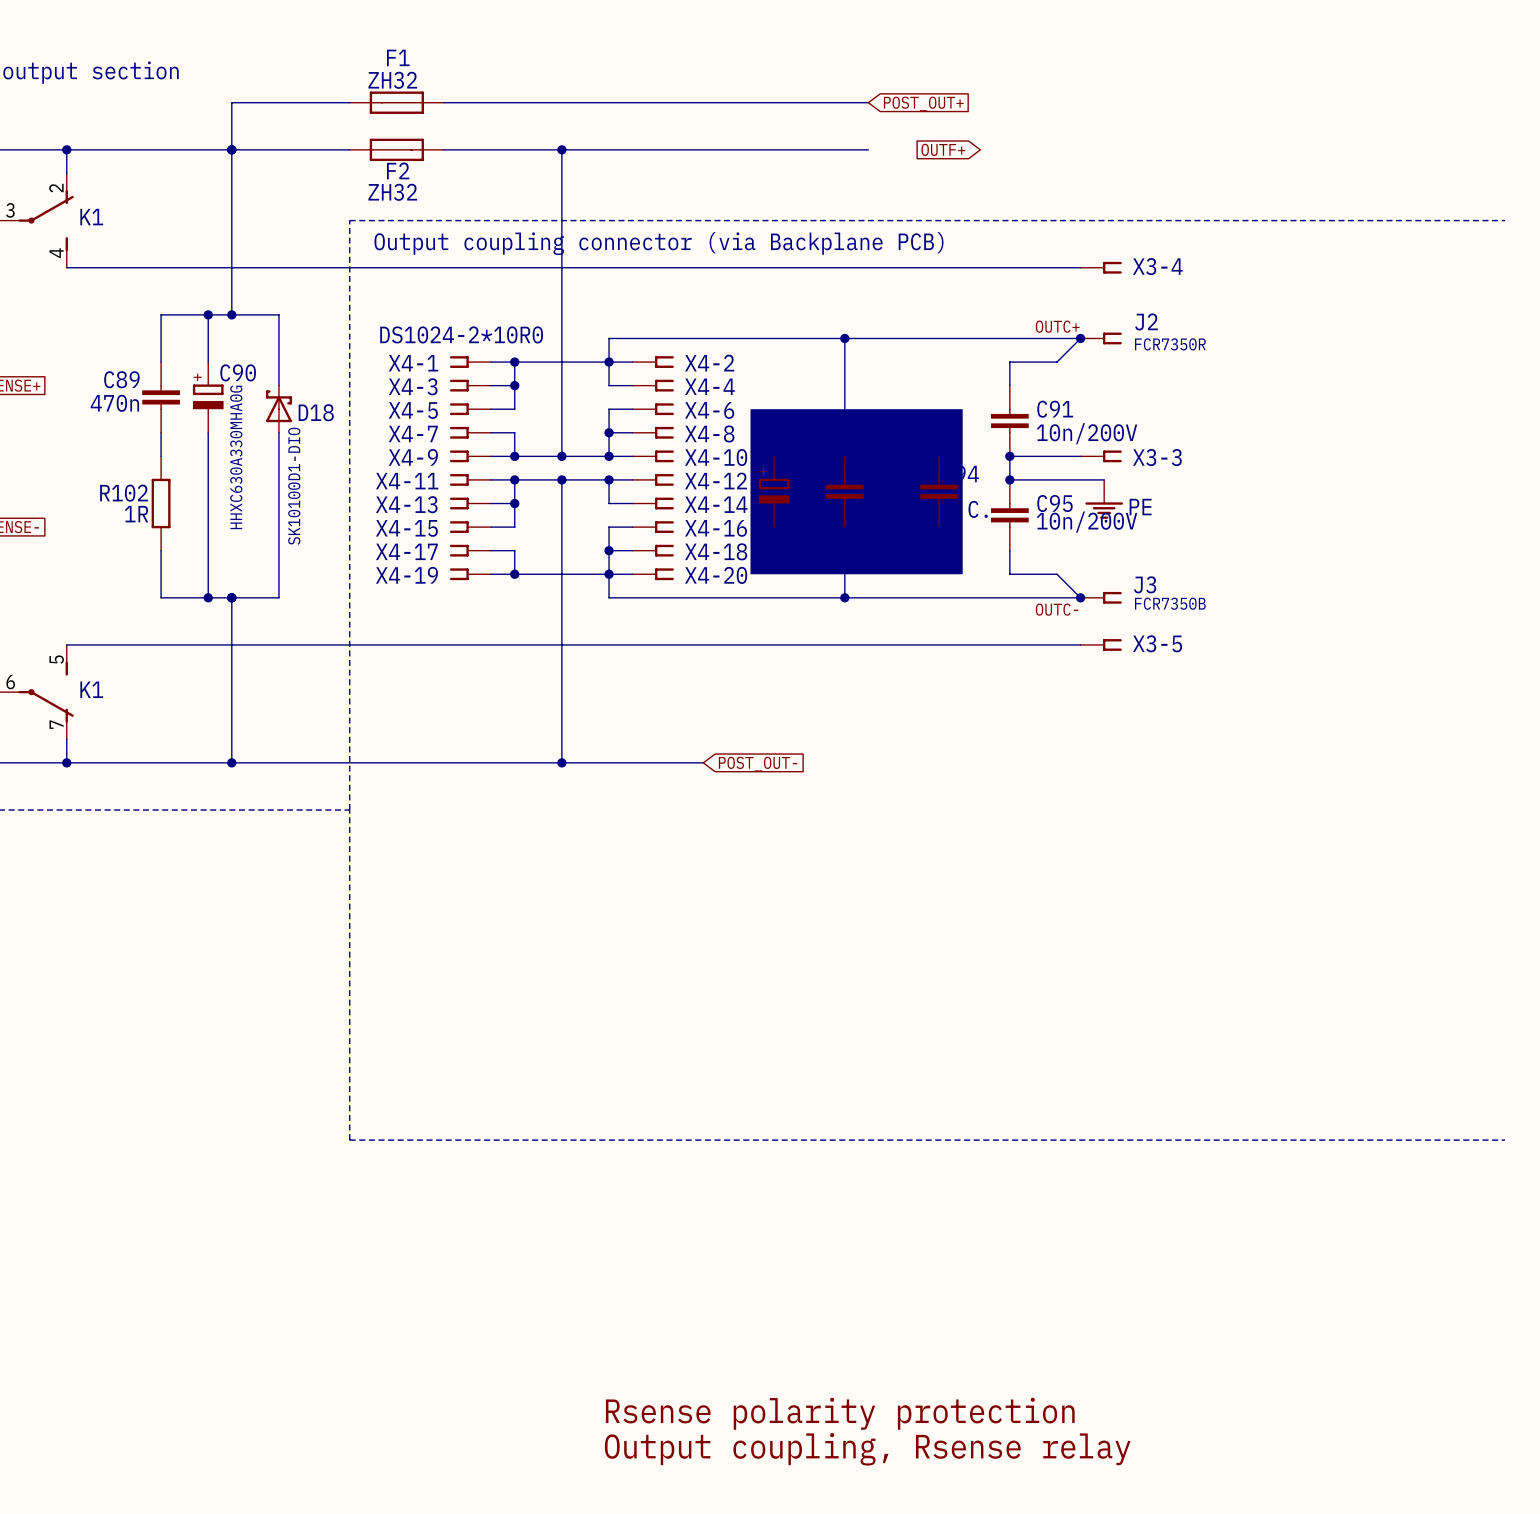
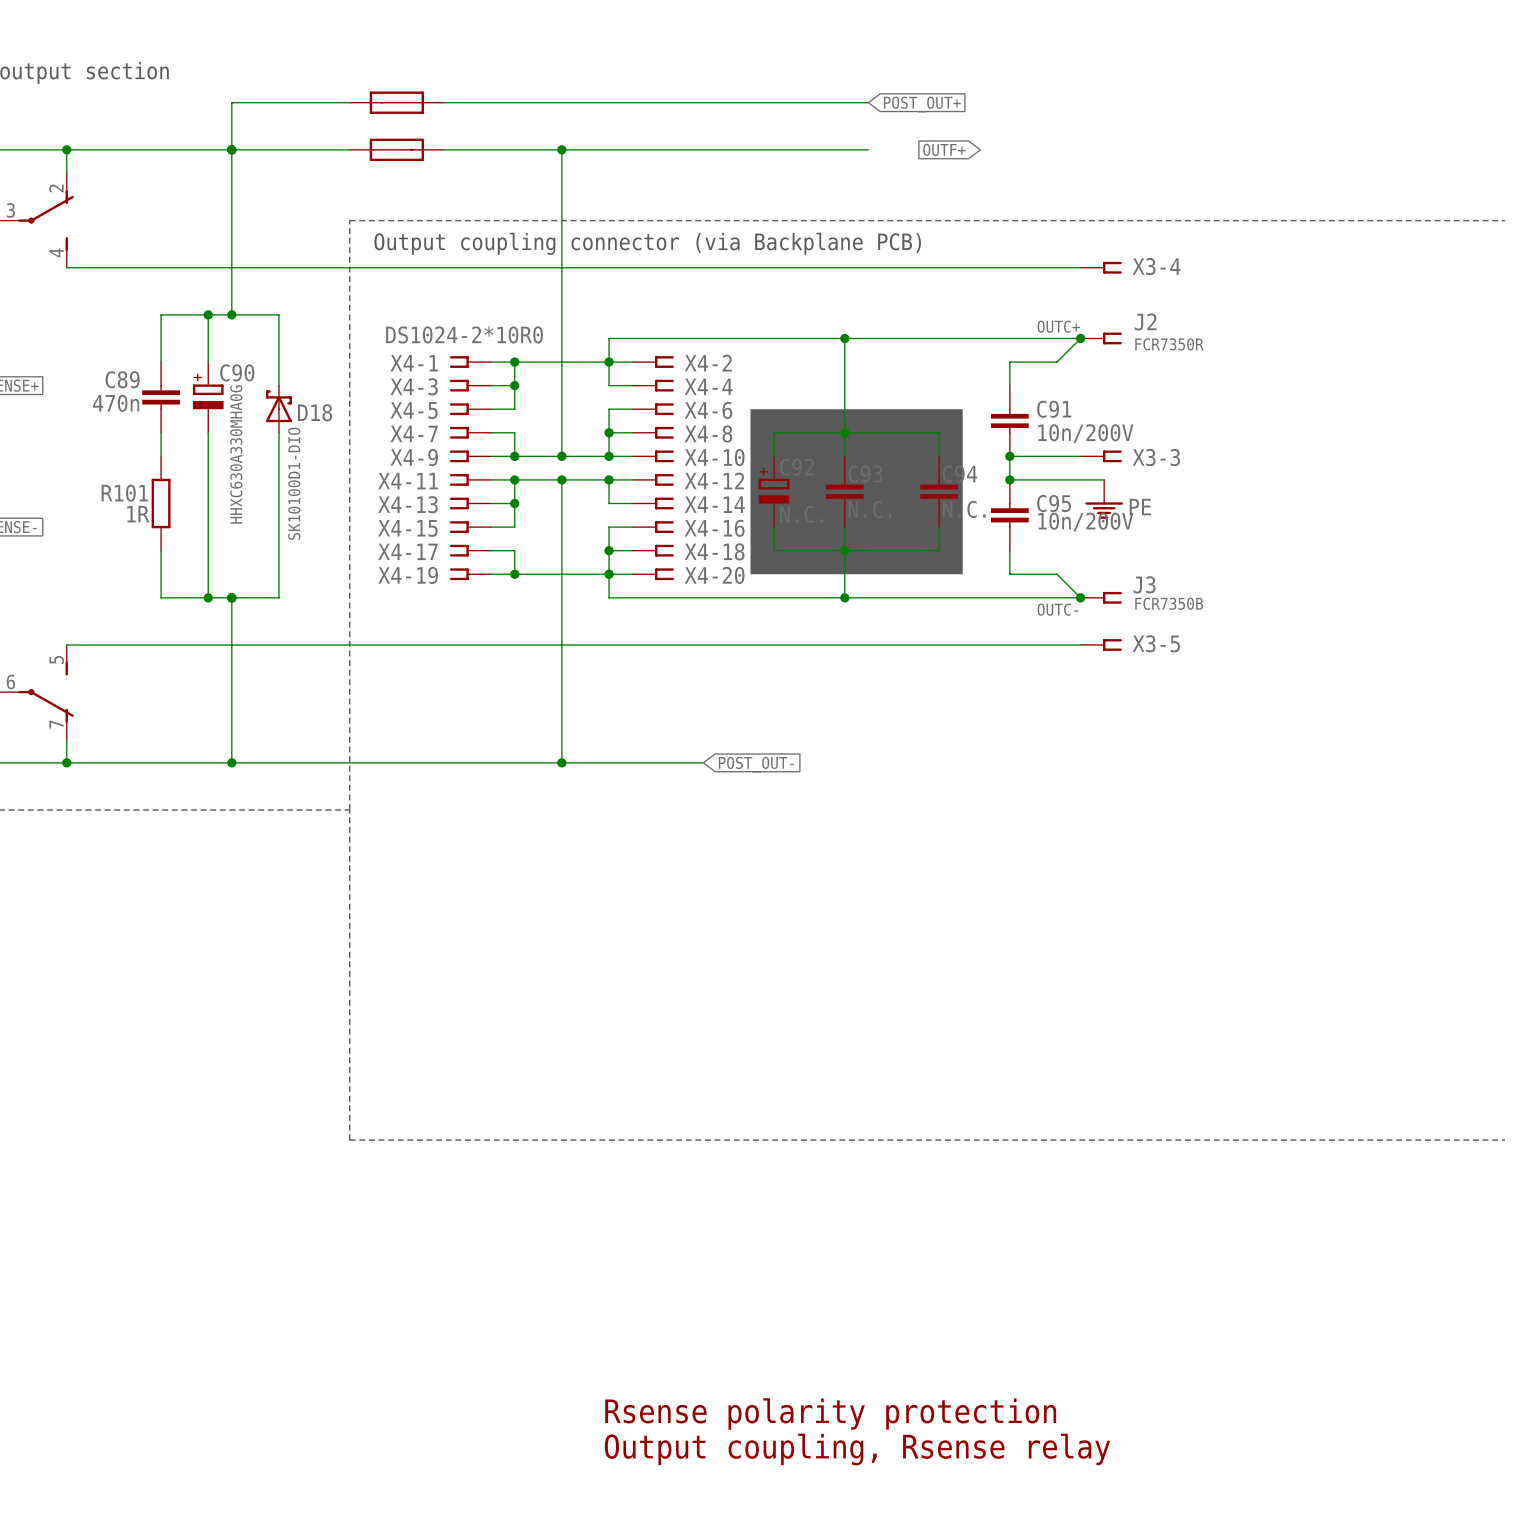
F1 name: F1 (398, 57) -> none
F1 value: ZH32 (392, 80) -> none
F2 name: F2 (398, 170) -> none
F2 value: ZH32 (392, 192) -> none
K1 name: K1 (91, 217) -> none
R102 name: R102 (124, 493) -> R101 (124, 493)
K1 name: K1 (91, 689) -> none

